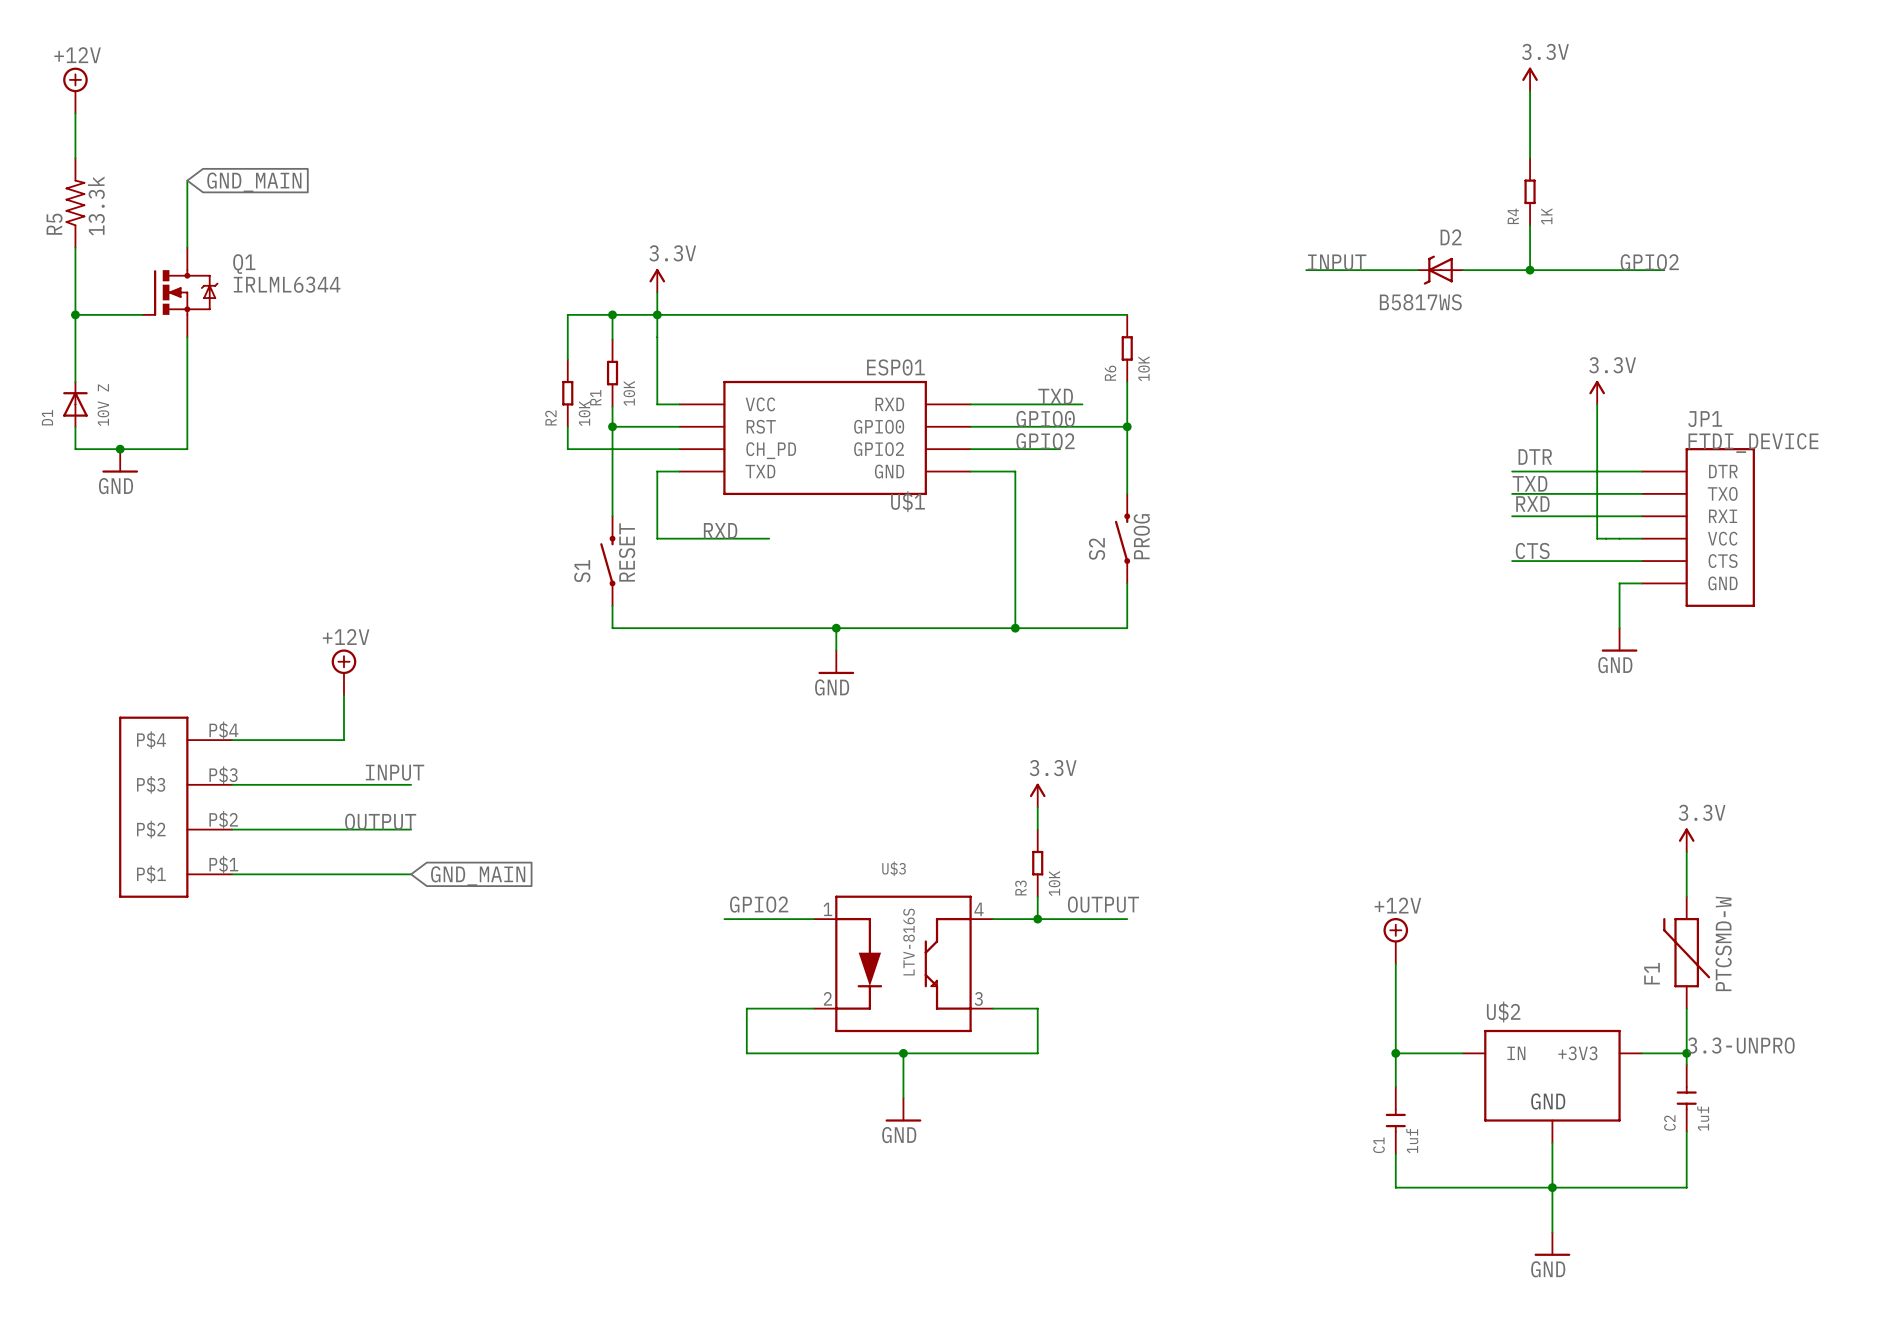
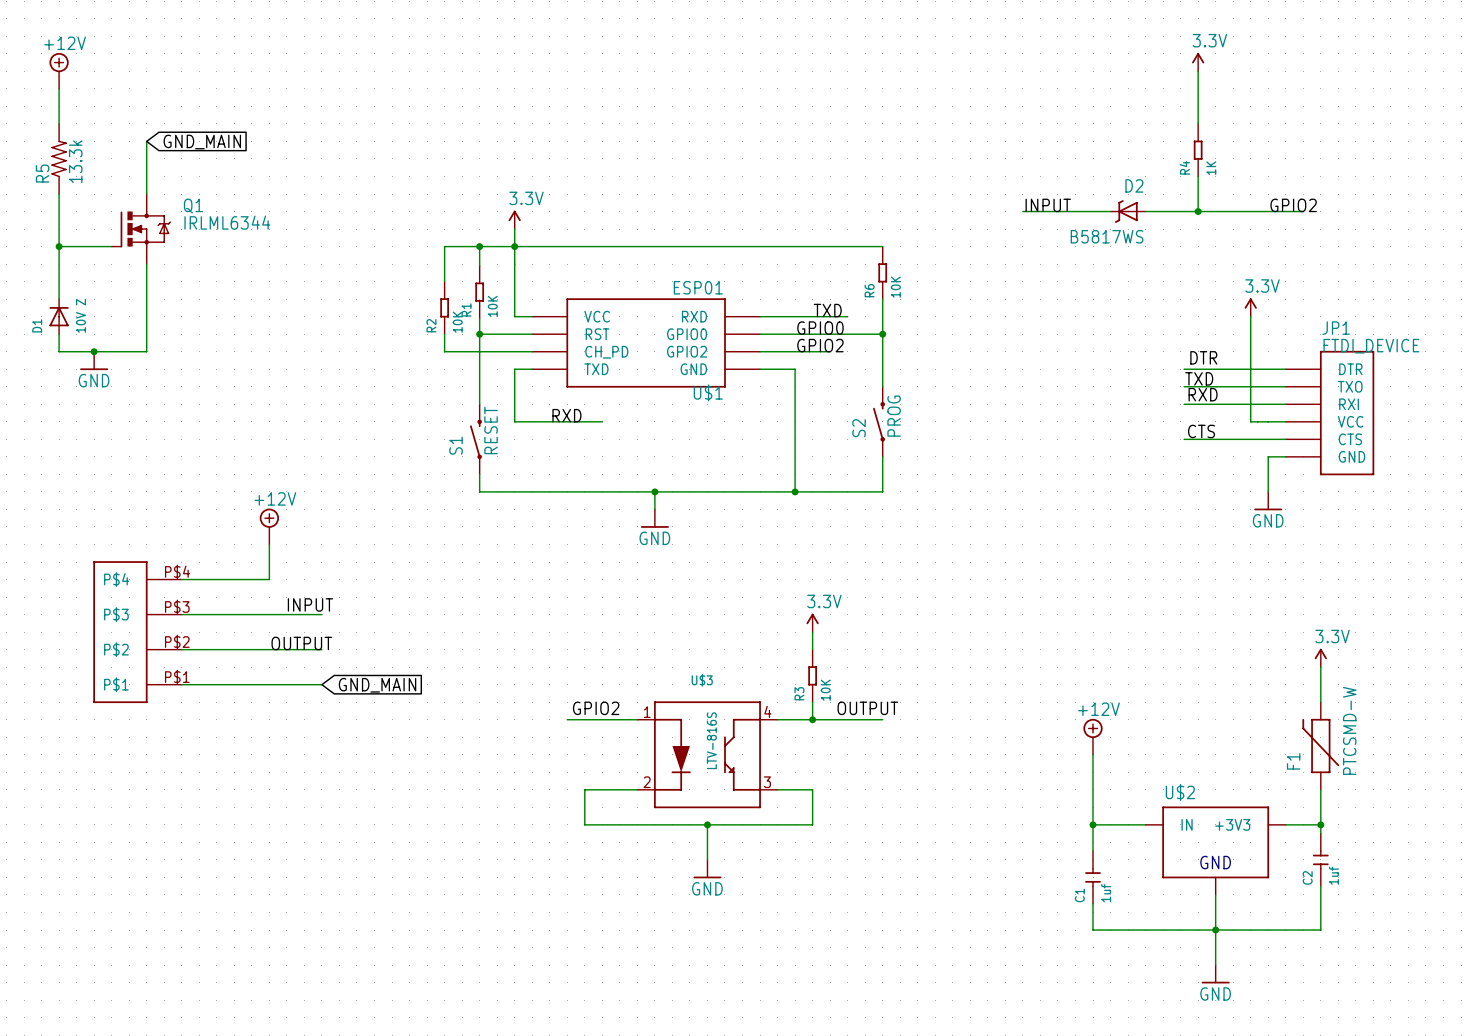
label: 3.3-UNPRO (1741, 1045) -> none

